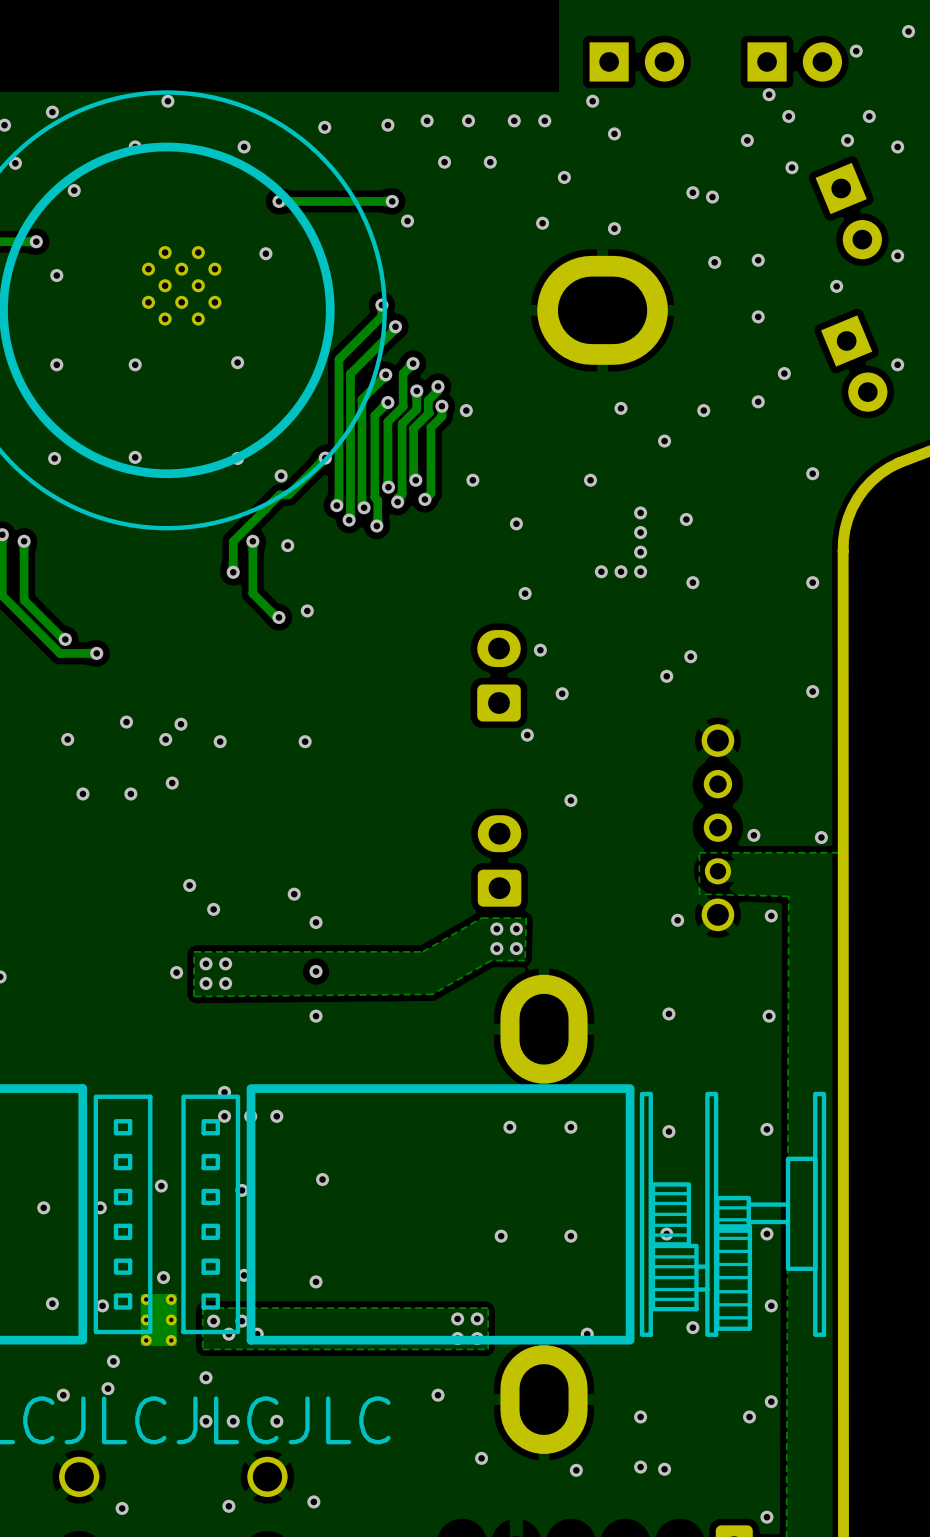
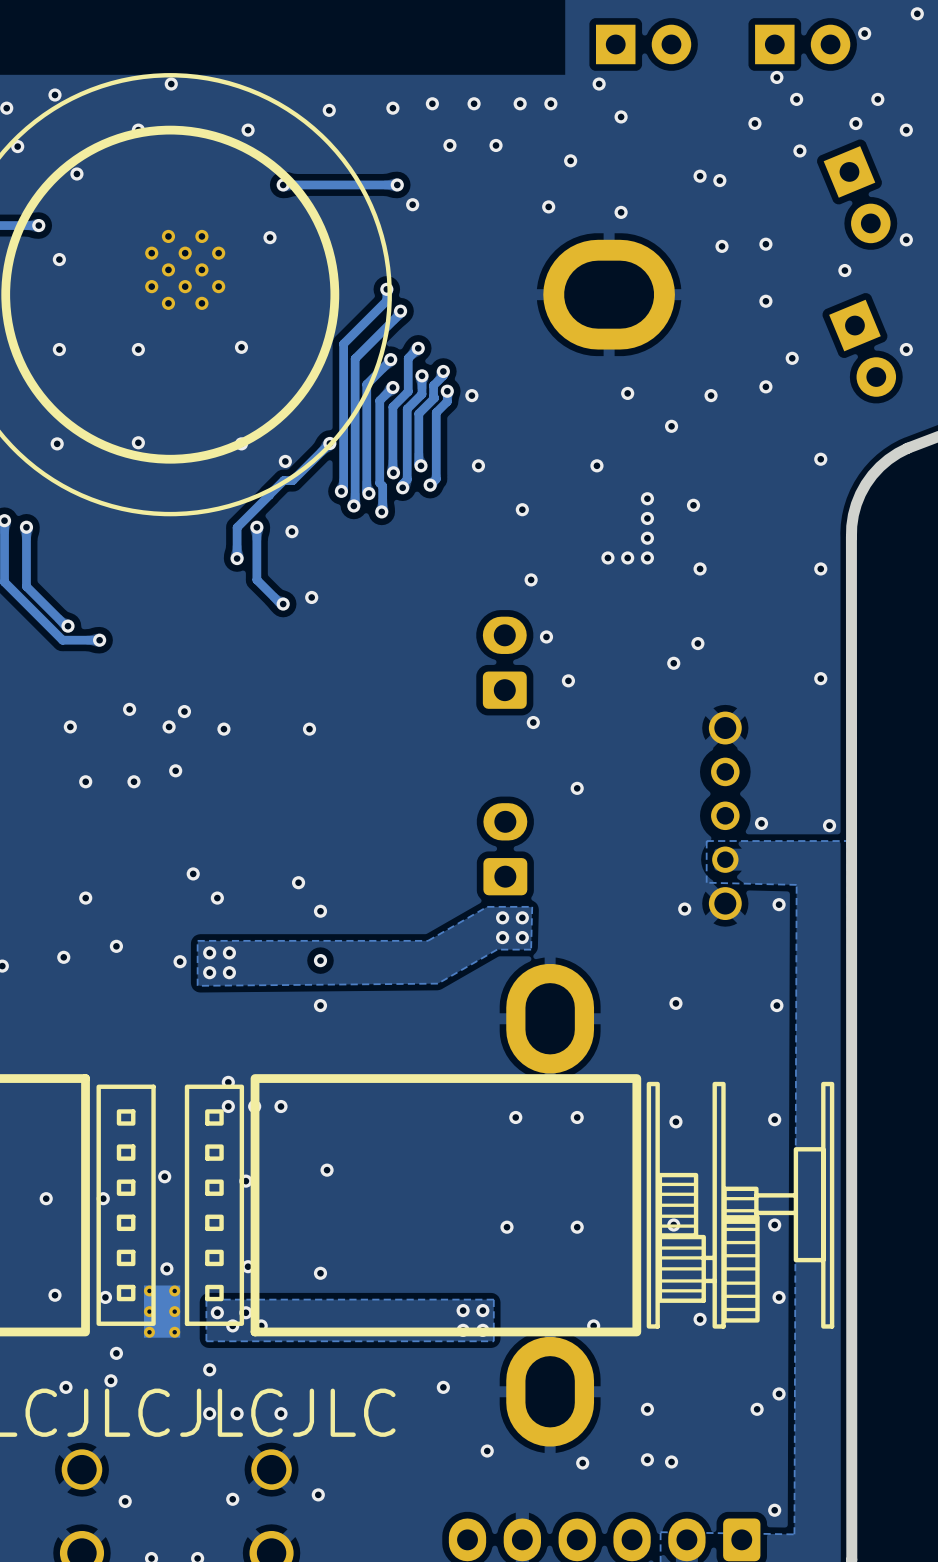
via: none -> (85, 898)
via: none -> (116, 946)
via: none -> (63, 957)

